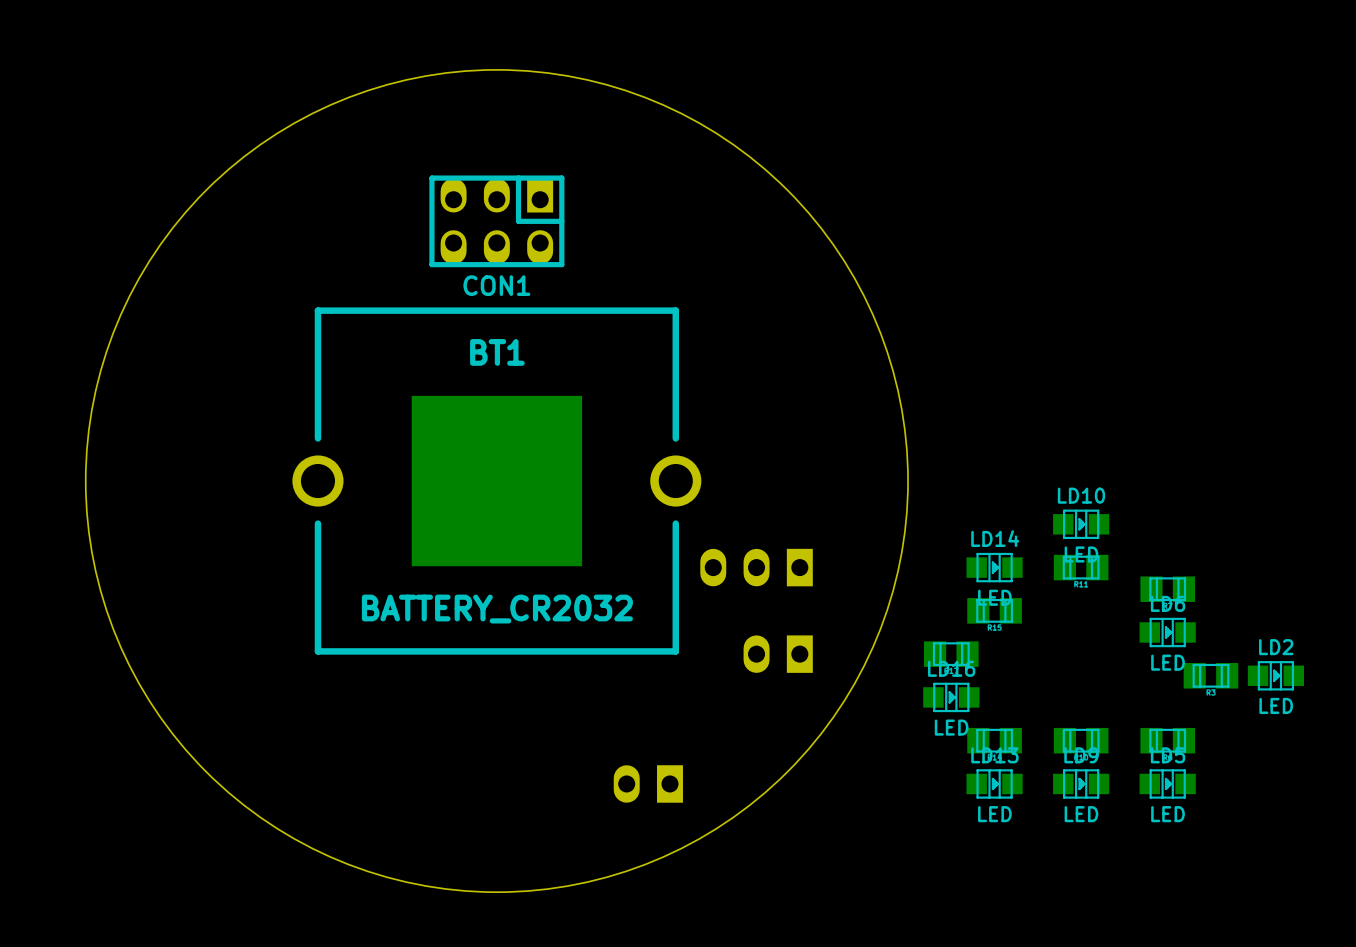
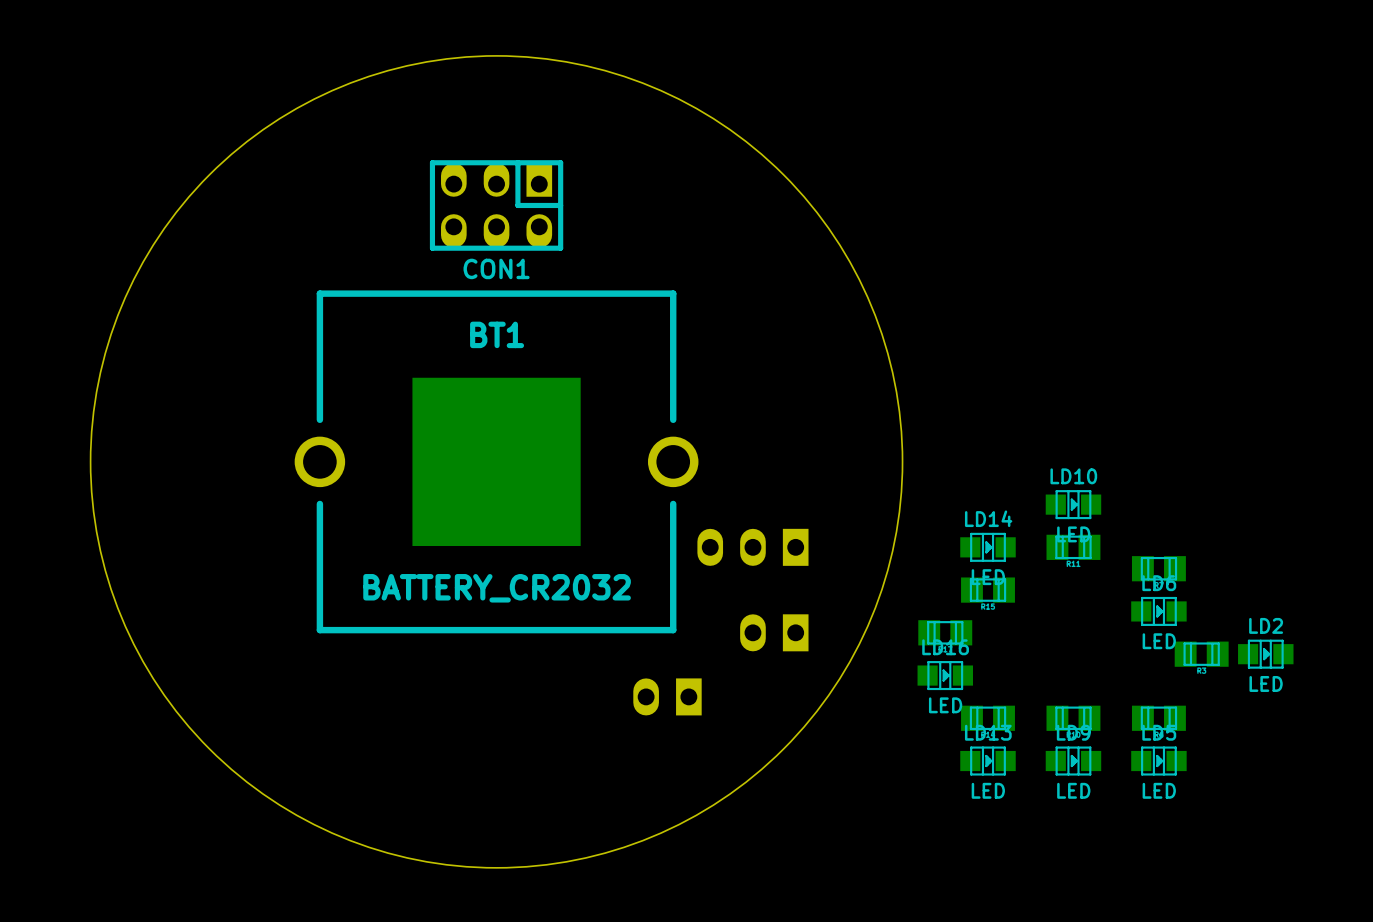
part position: (648, 783) -> (667, 696)

